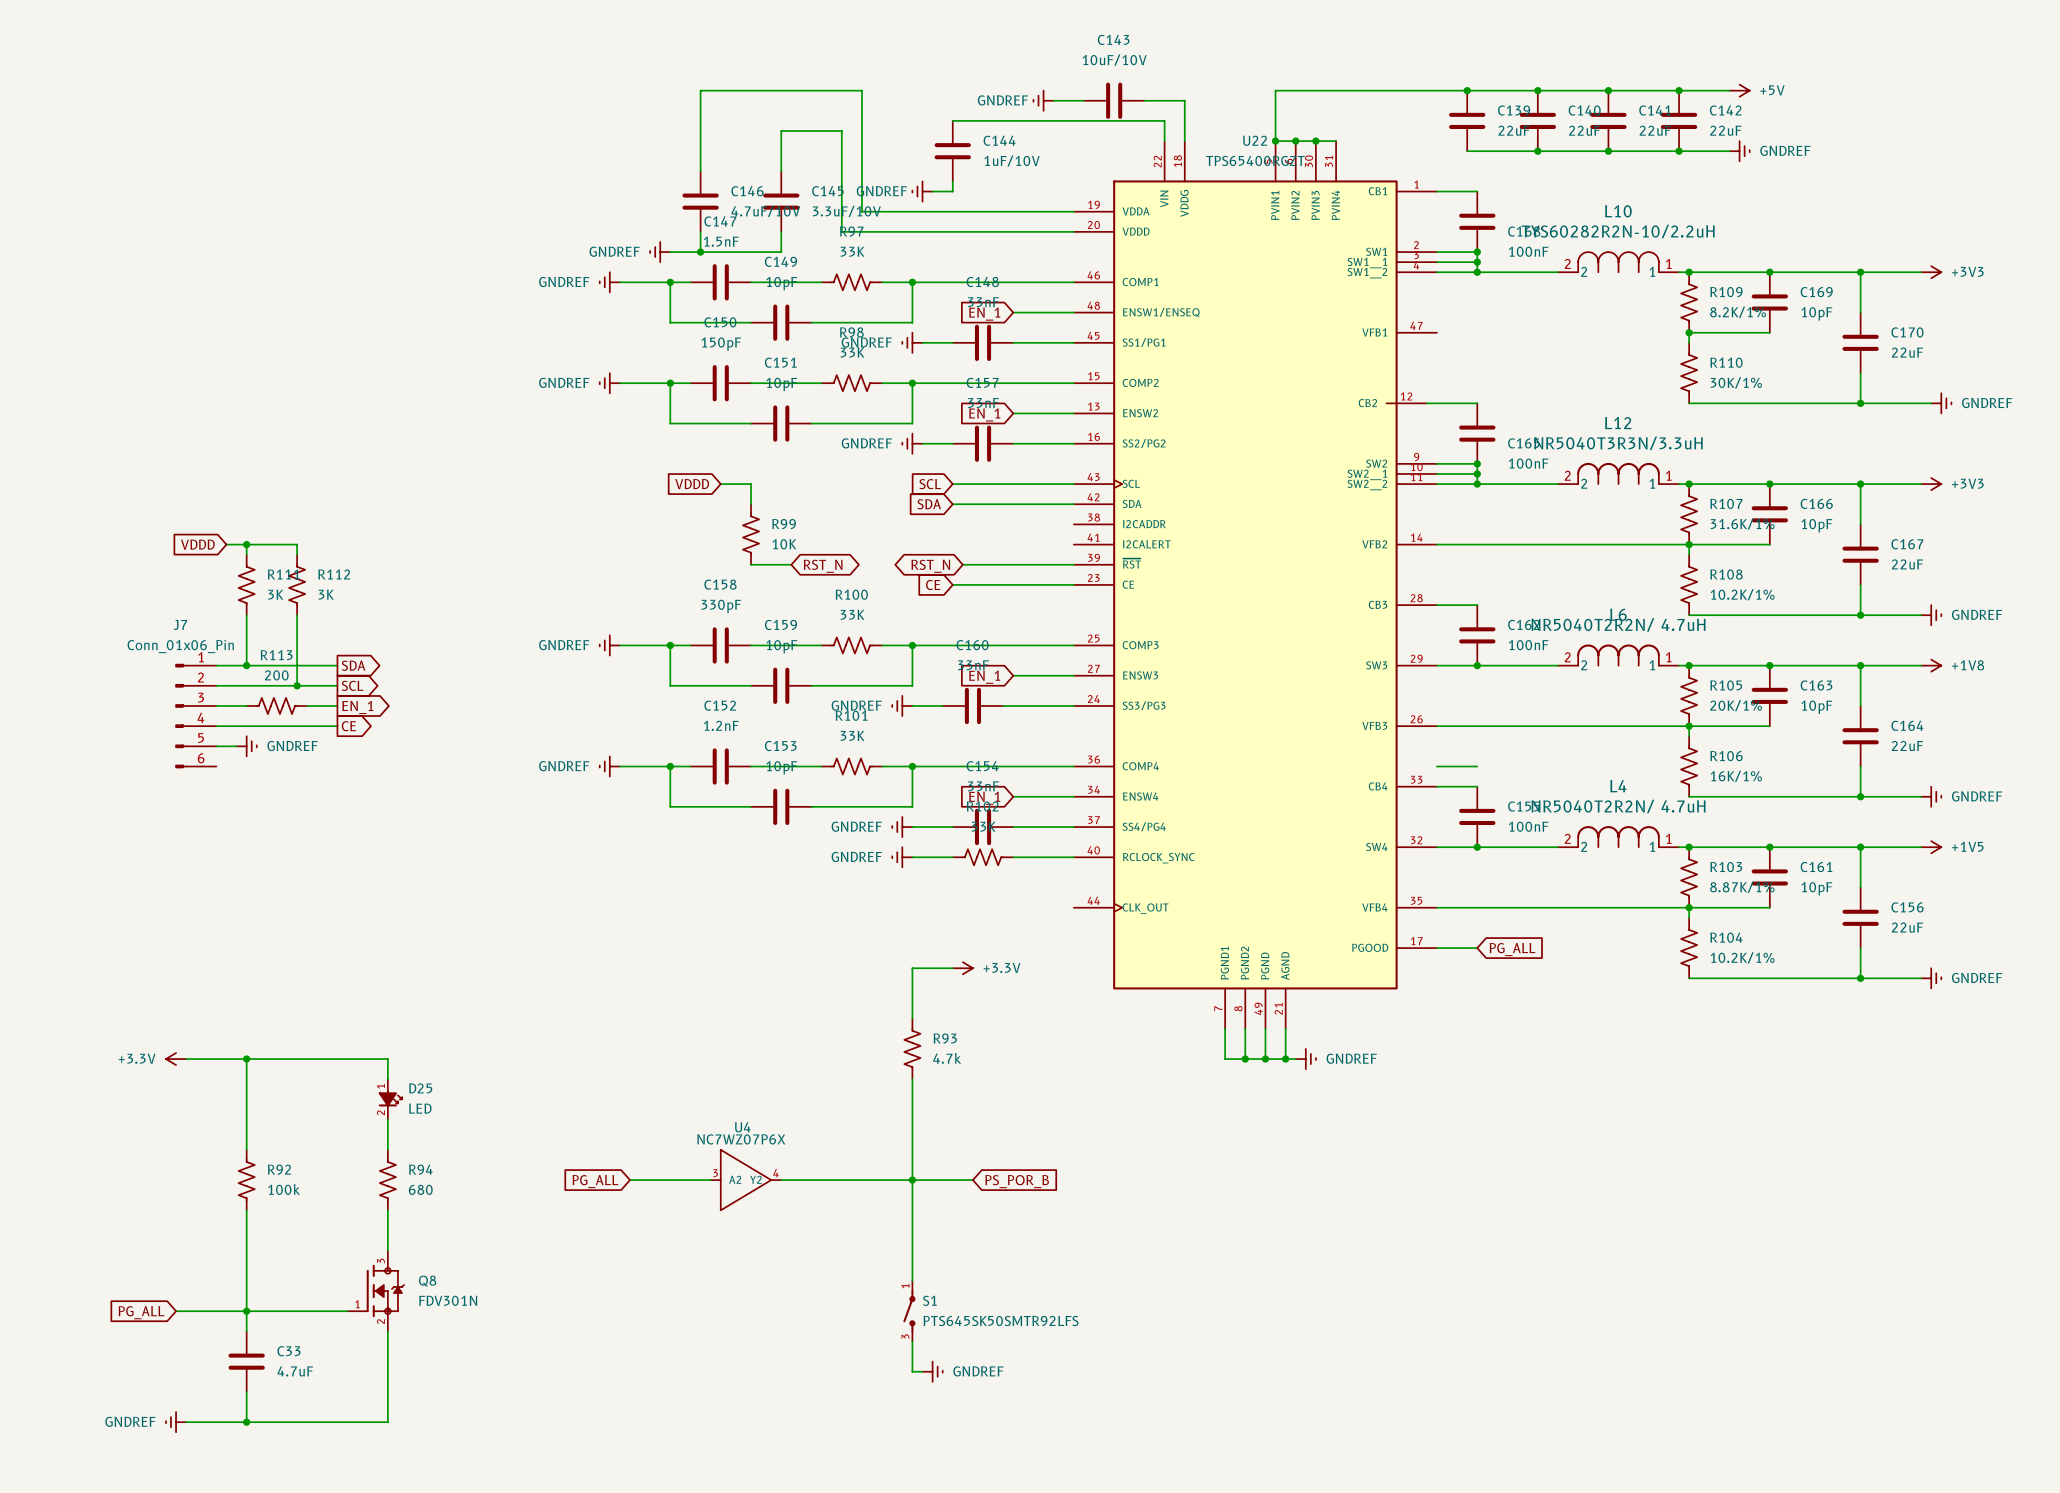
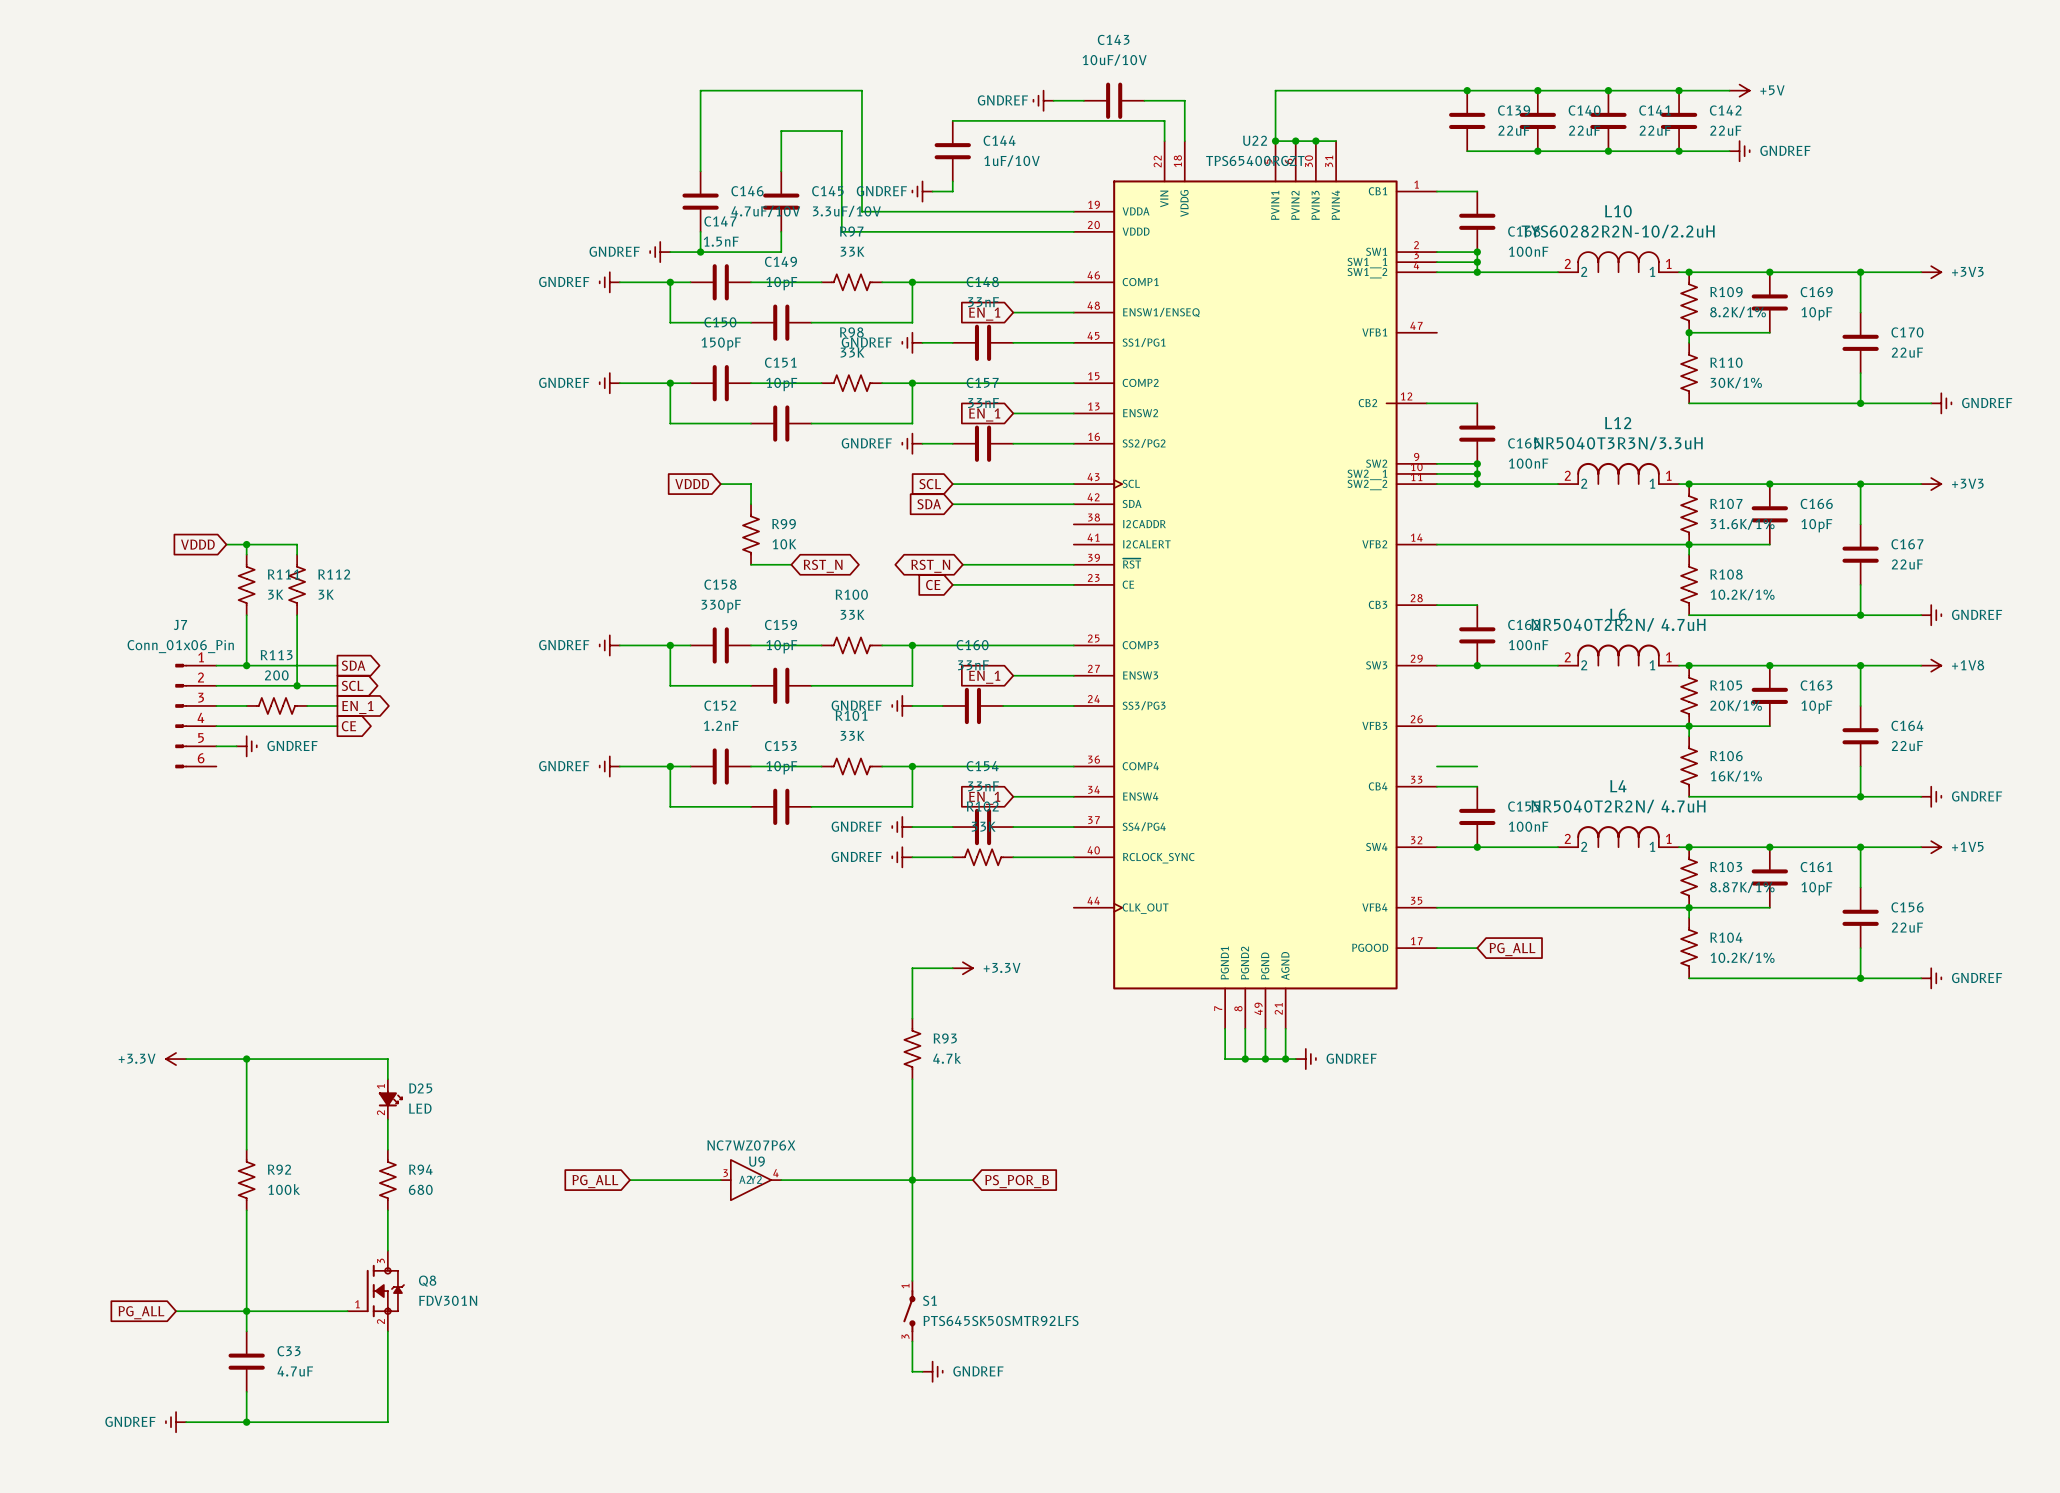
U4: NC7WZ07P6X (745, 1180) -> none
U9: none -> NC7WZ07P6X (751, 1180)

